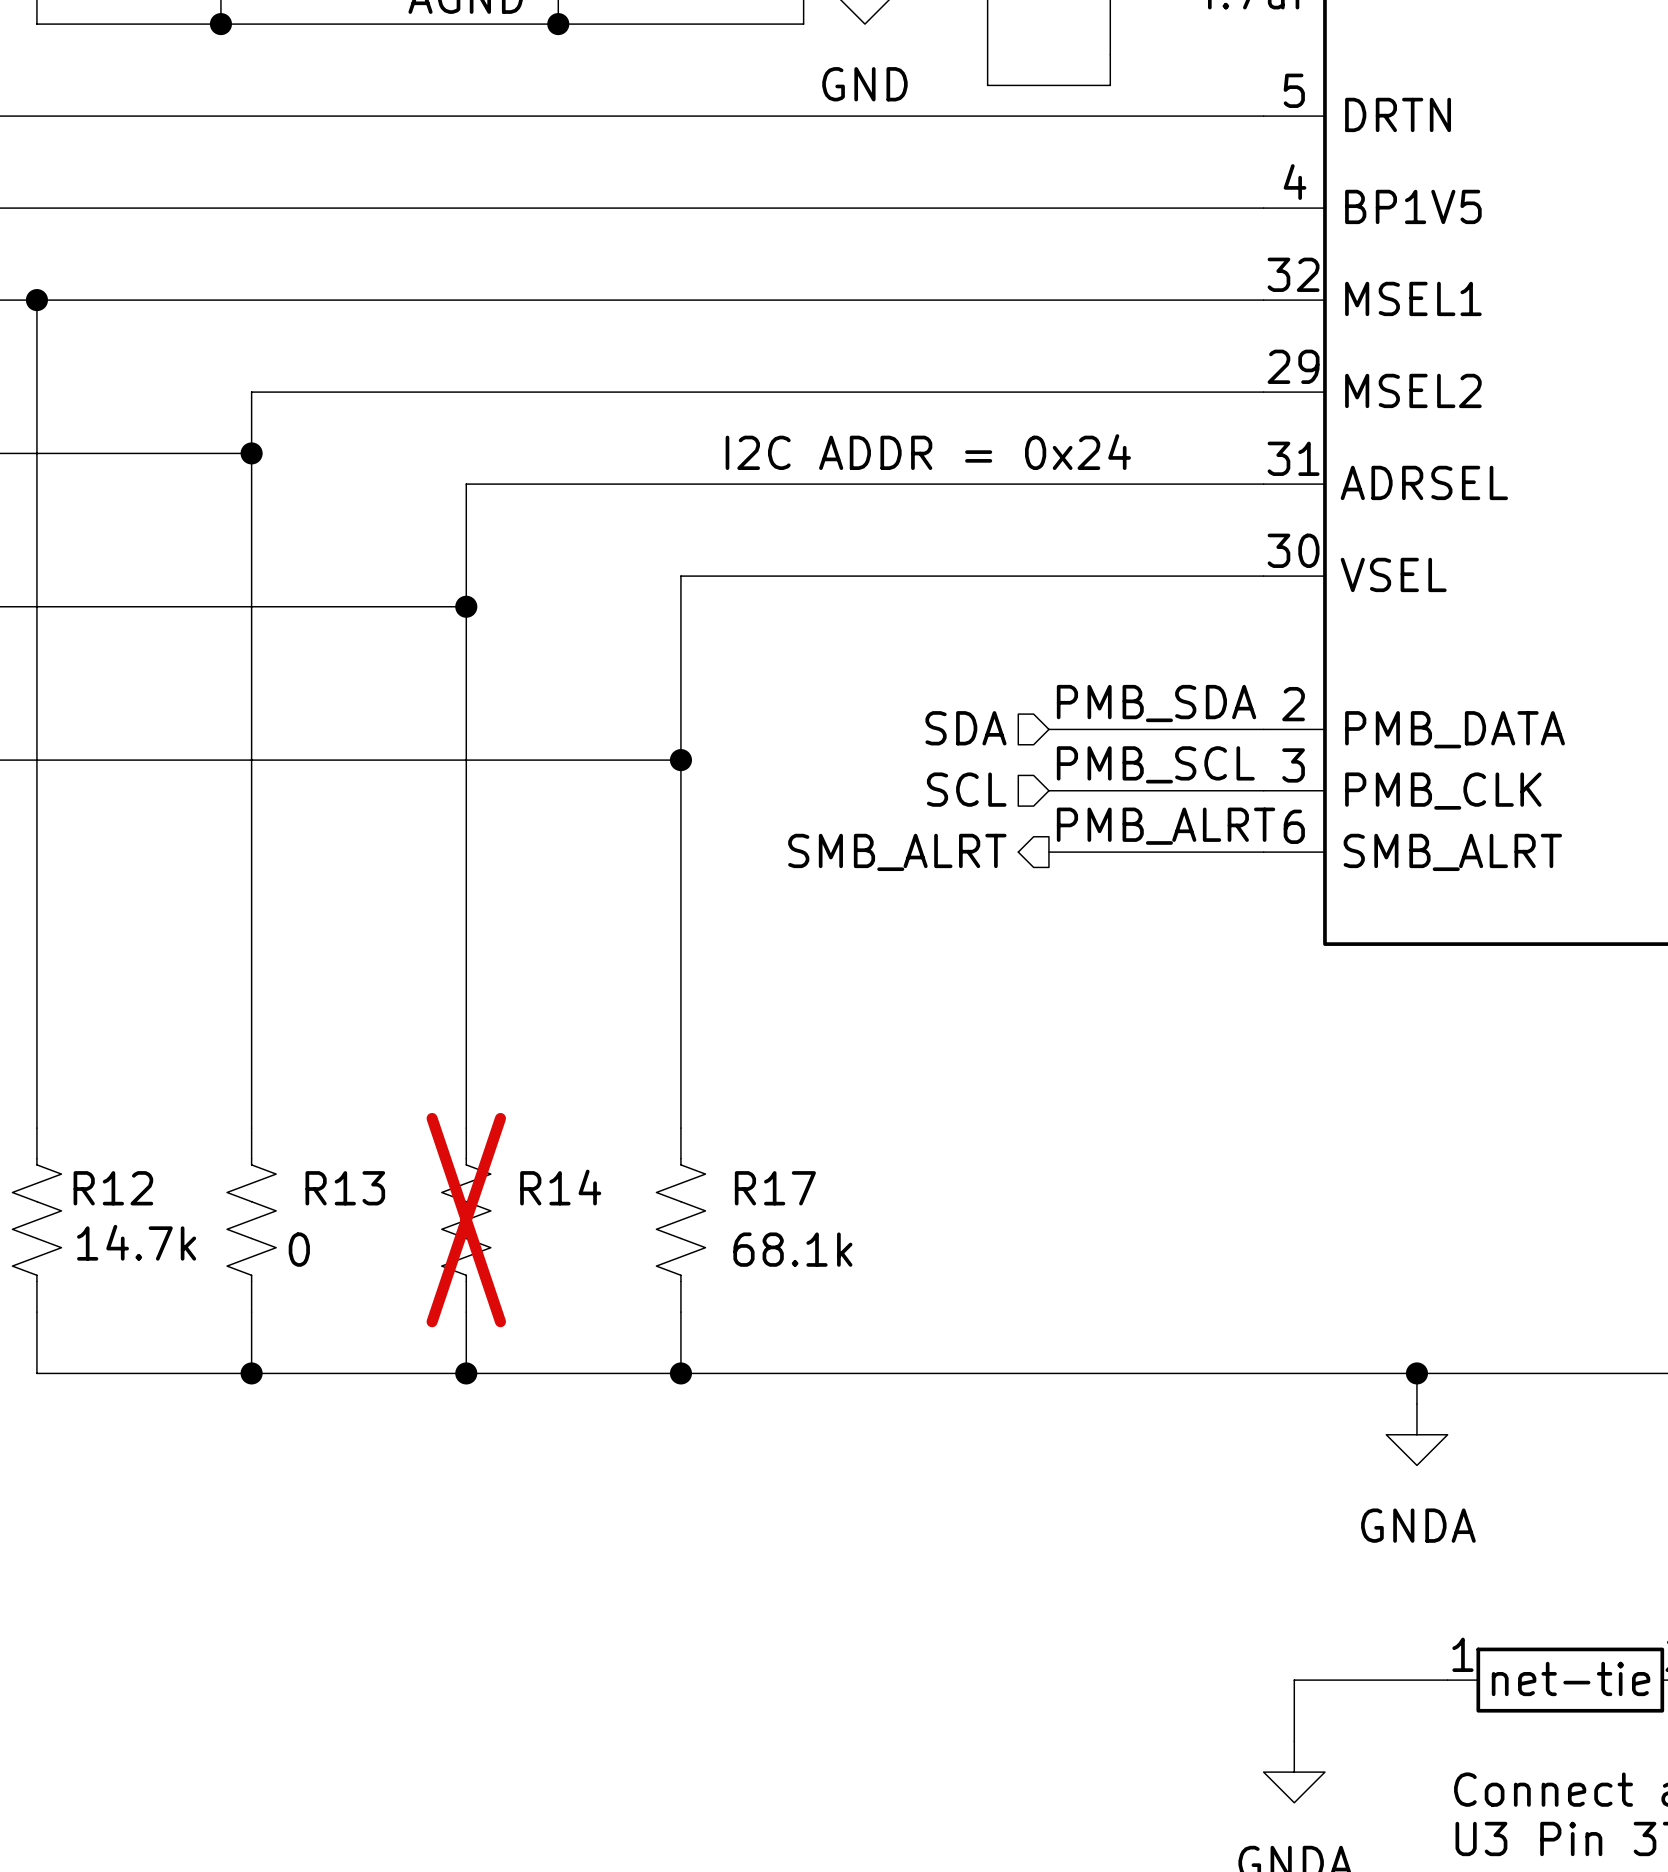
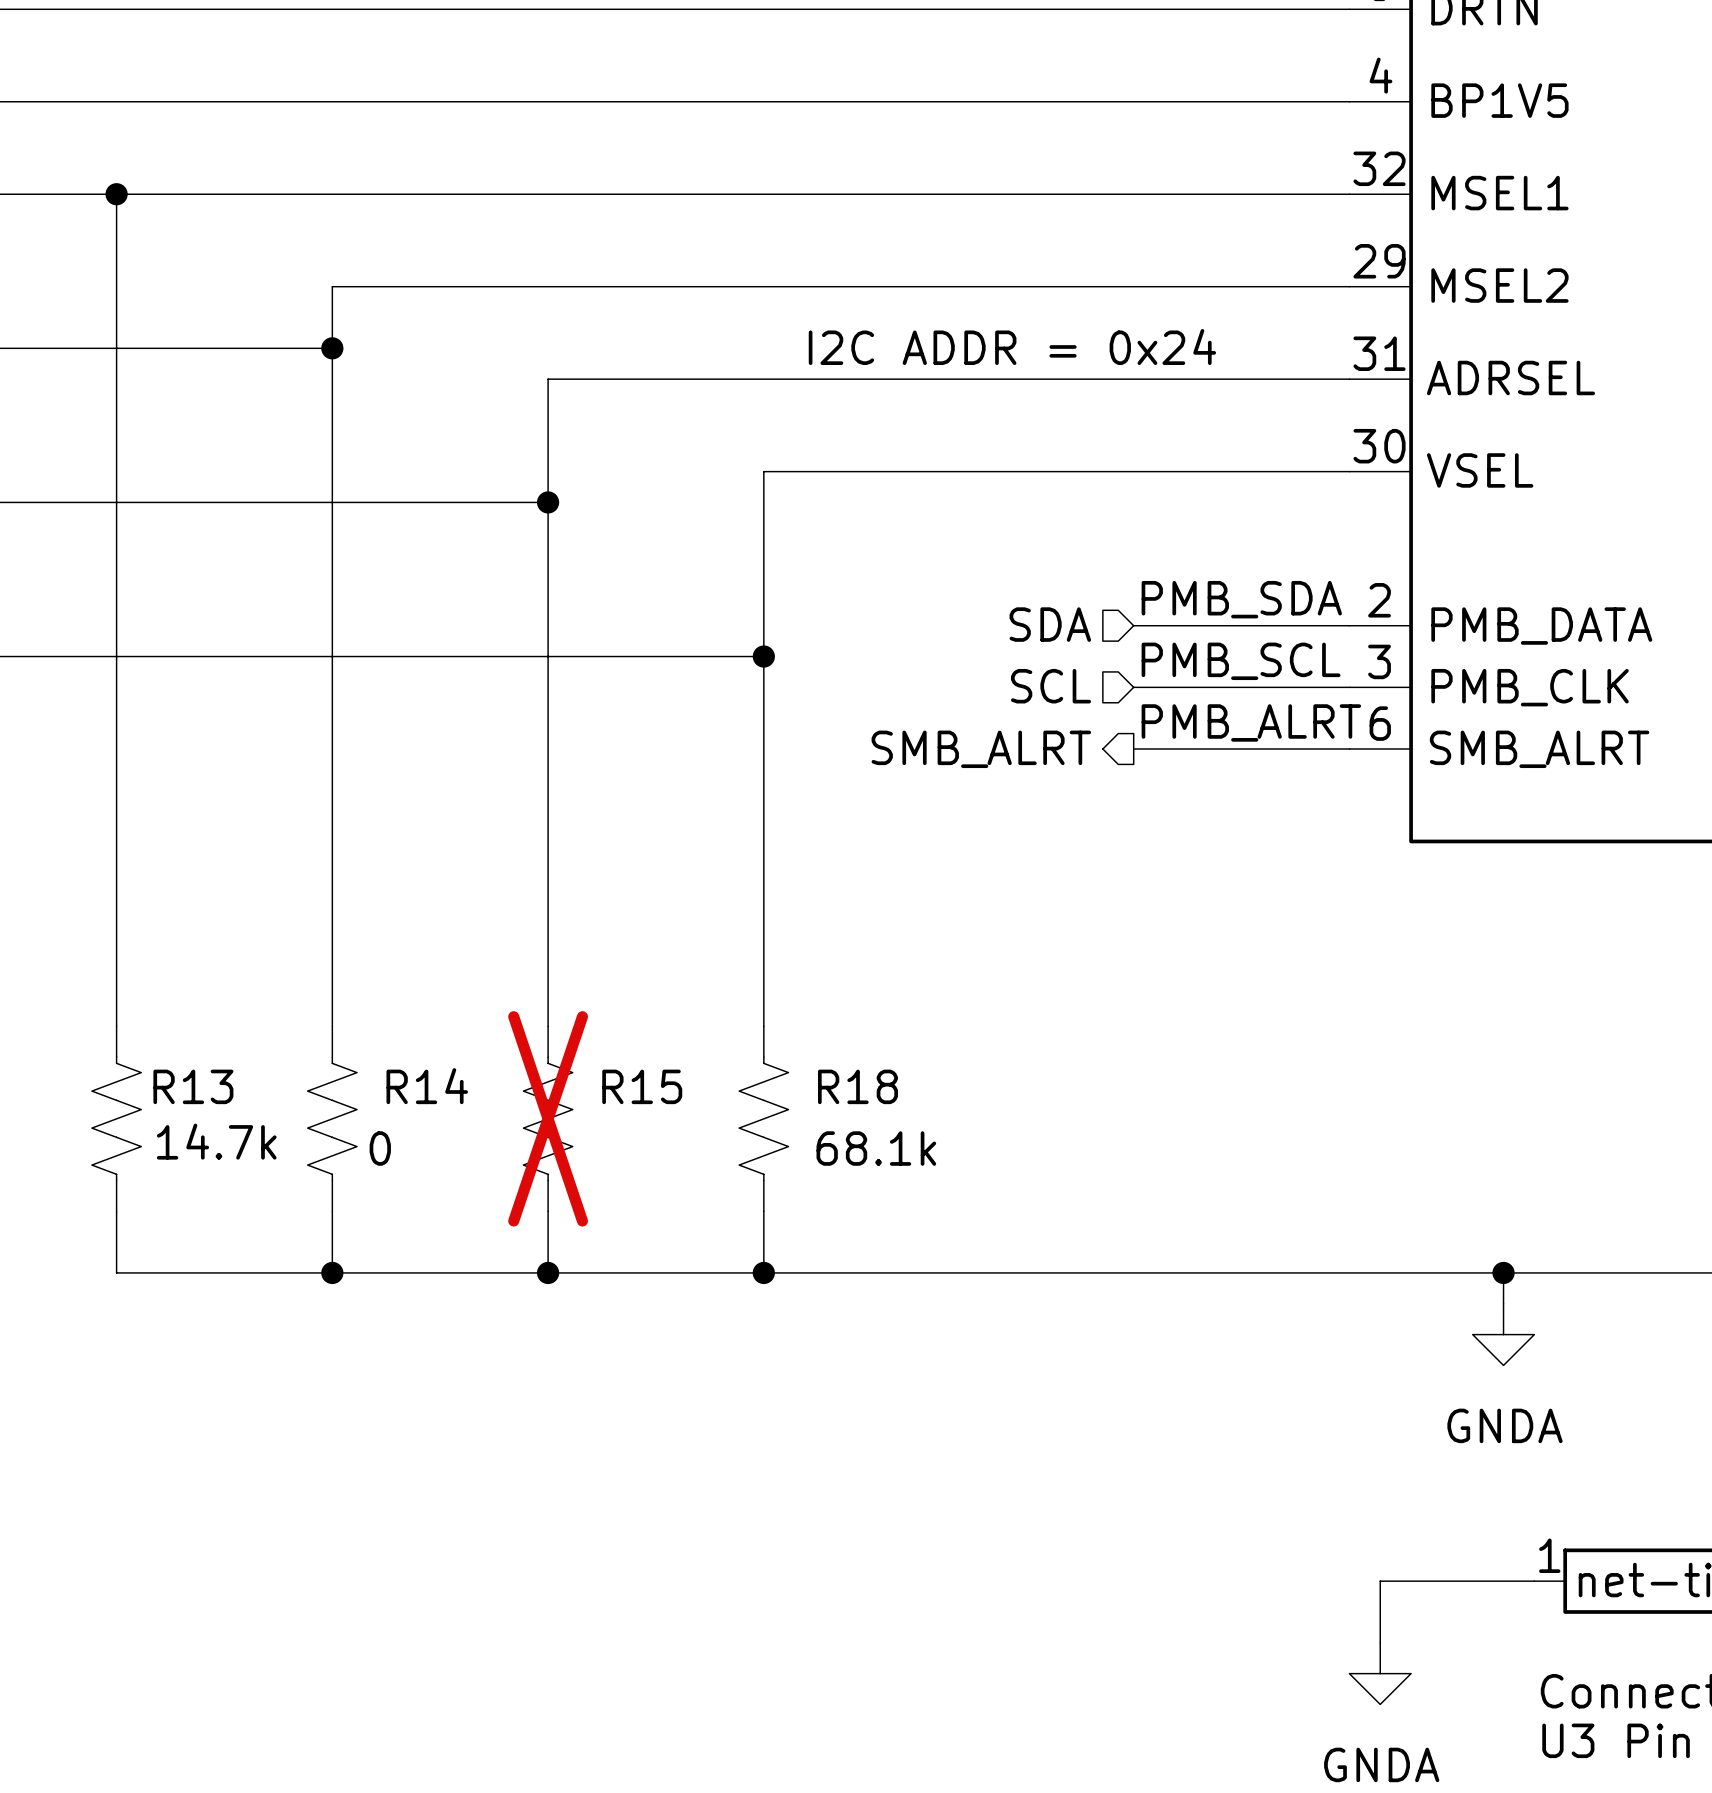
R14 name: R14 (560, 1187) -> R15 (642, 1086)
R12 name: R12 (113, 1188) -> R13 (193, 1086)
R13 name: R13 (345, 1188) -> R14 (427, 1086)
R17 name: R17 (775, 1188) -> R18 (857, 1086)

